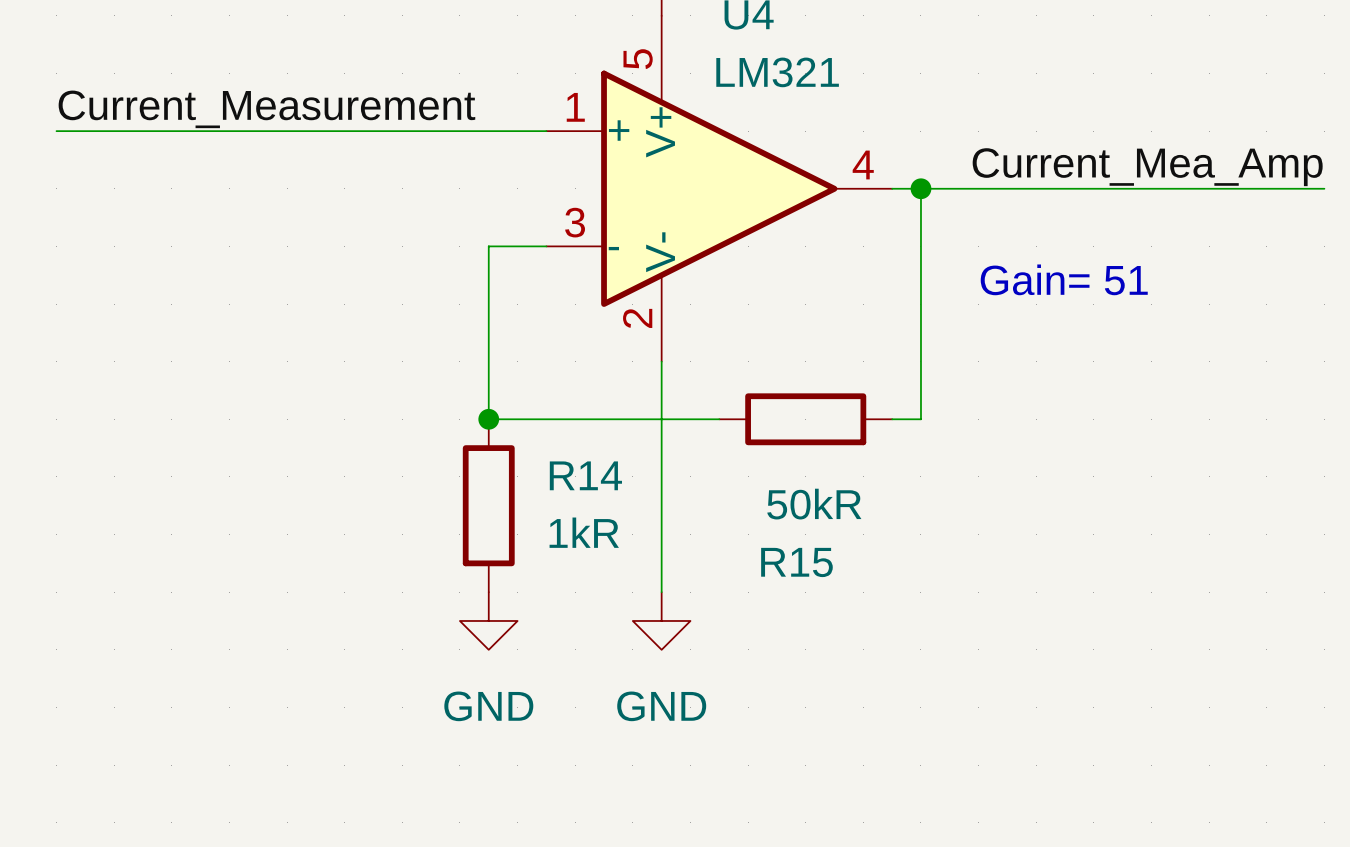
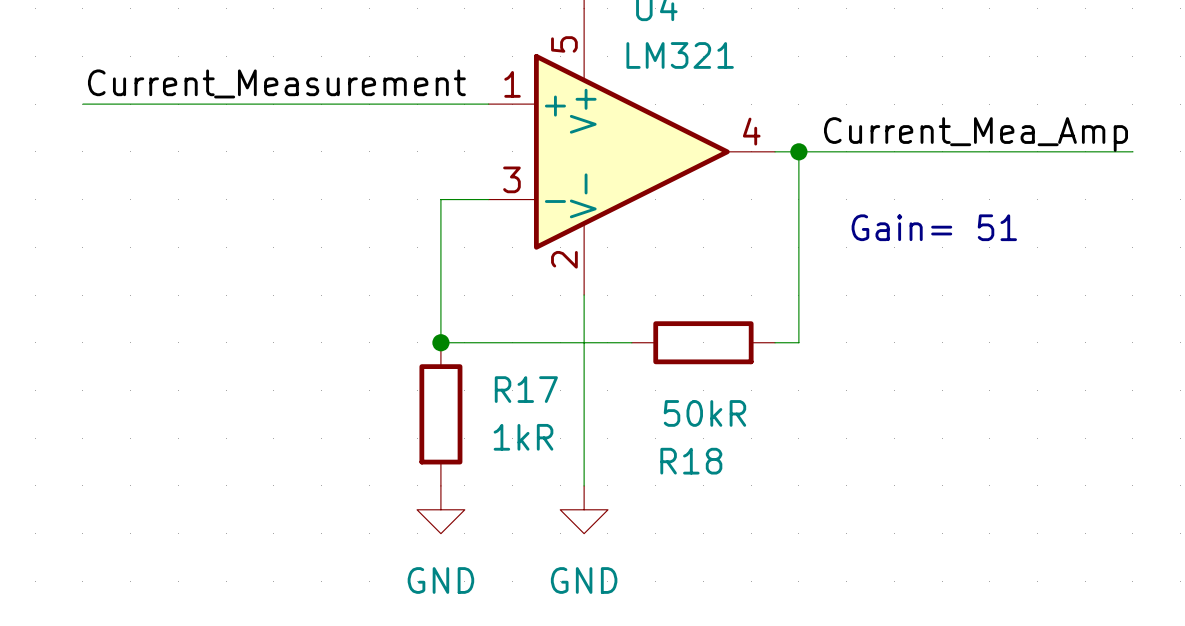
R14 name: R14 (585, 475) -> R17 (526, 389)
R15 name: R15 (796, 562) -> R18 (691, 461)

